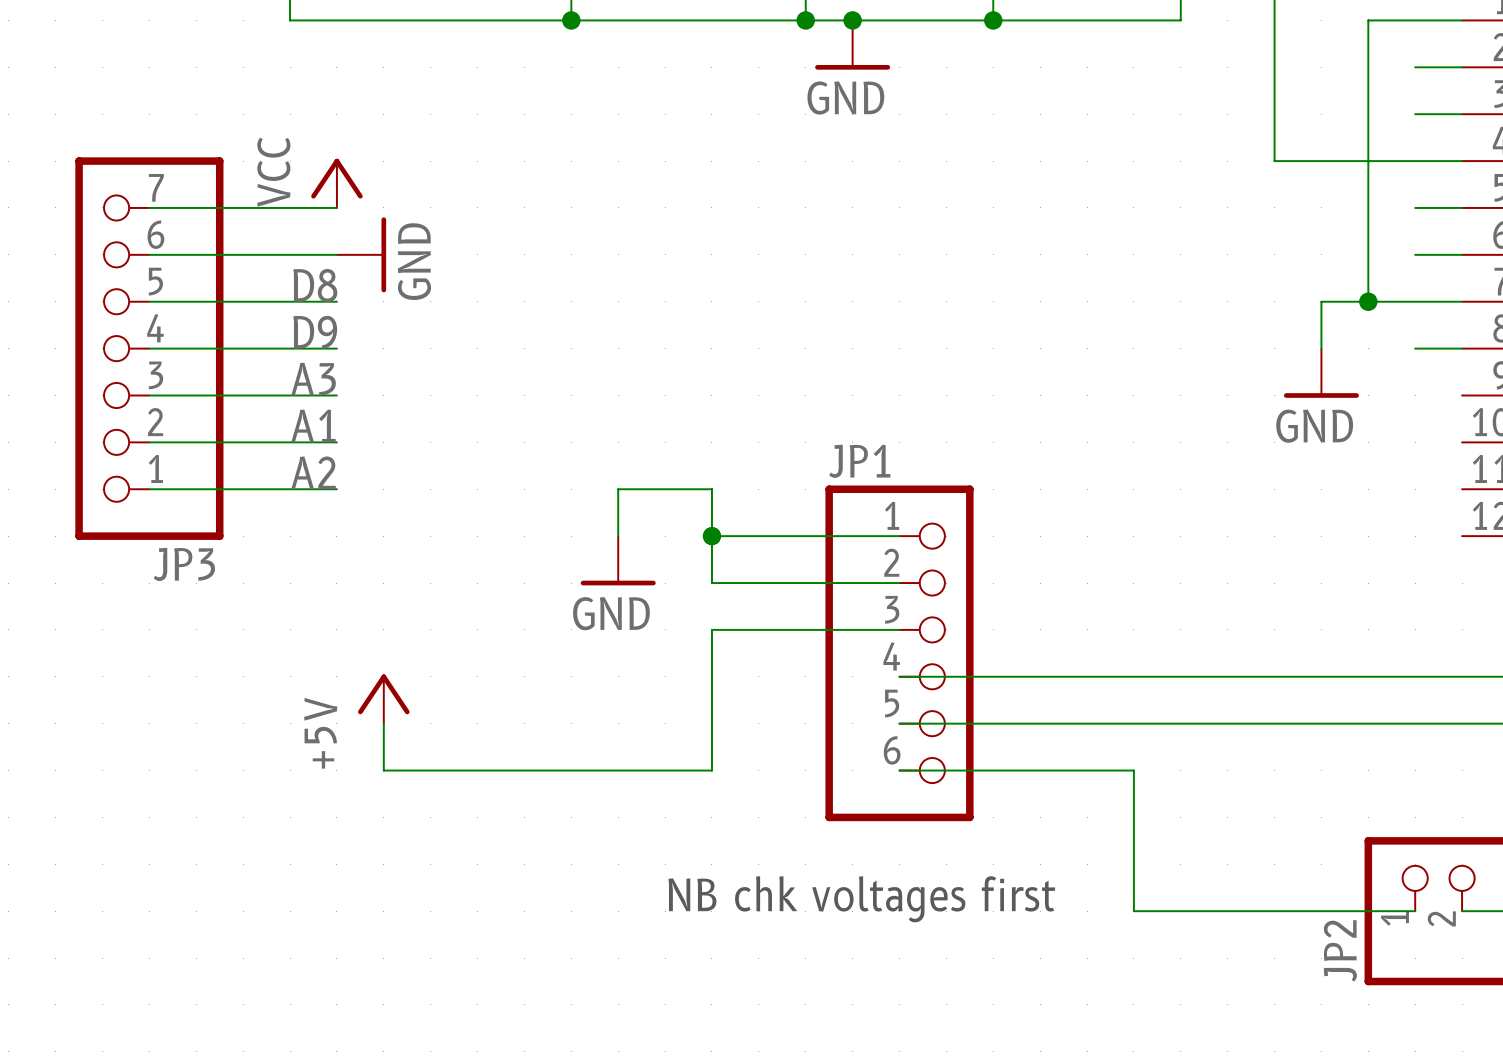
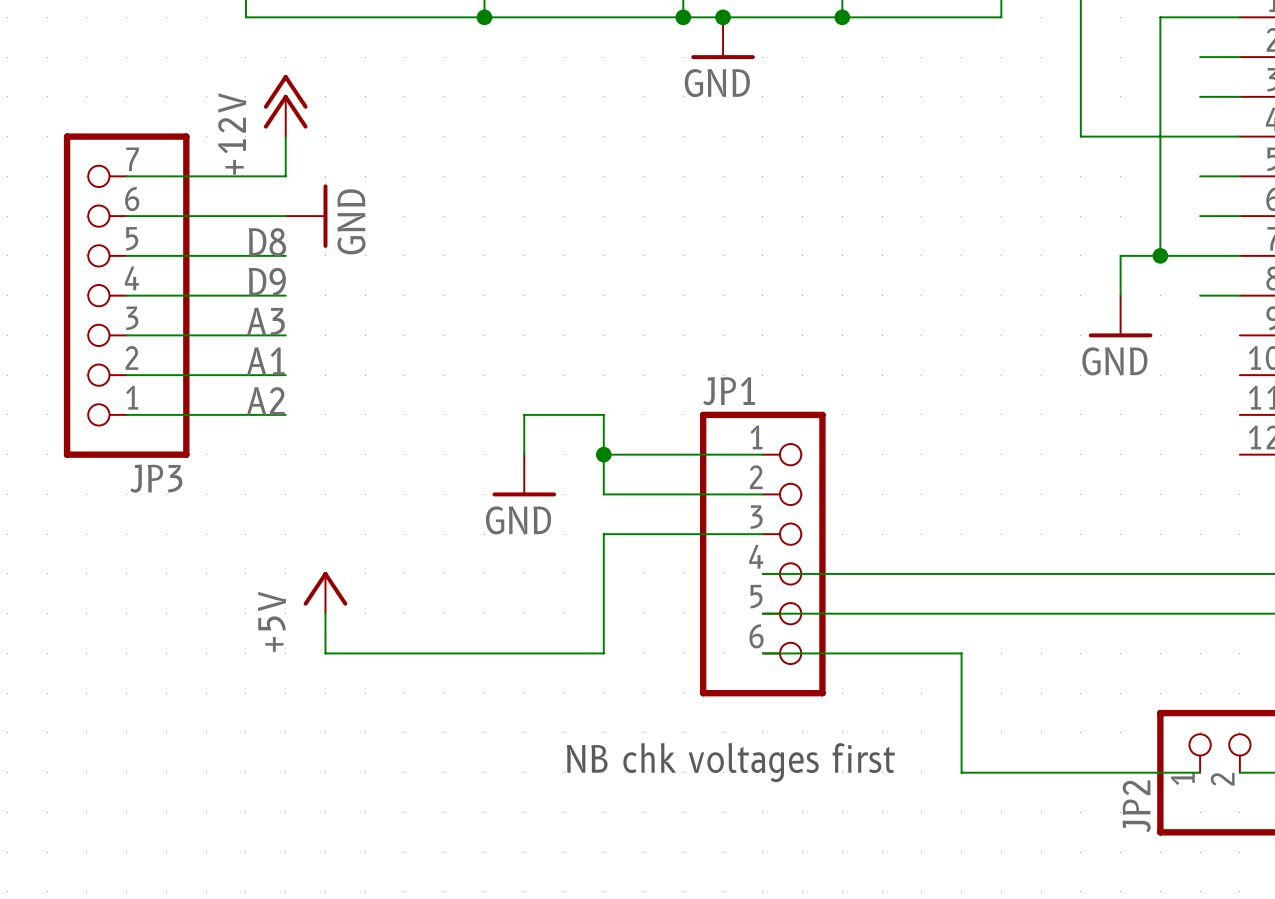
power symbol: none -> +12V (285, 105)
power symbol: VCC (336, 183) -> none

